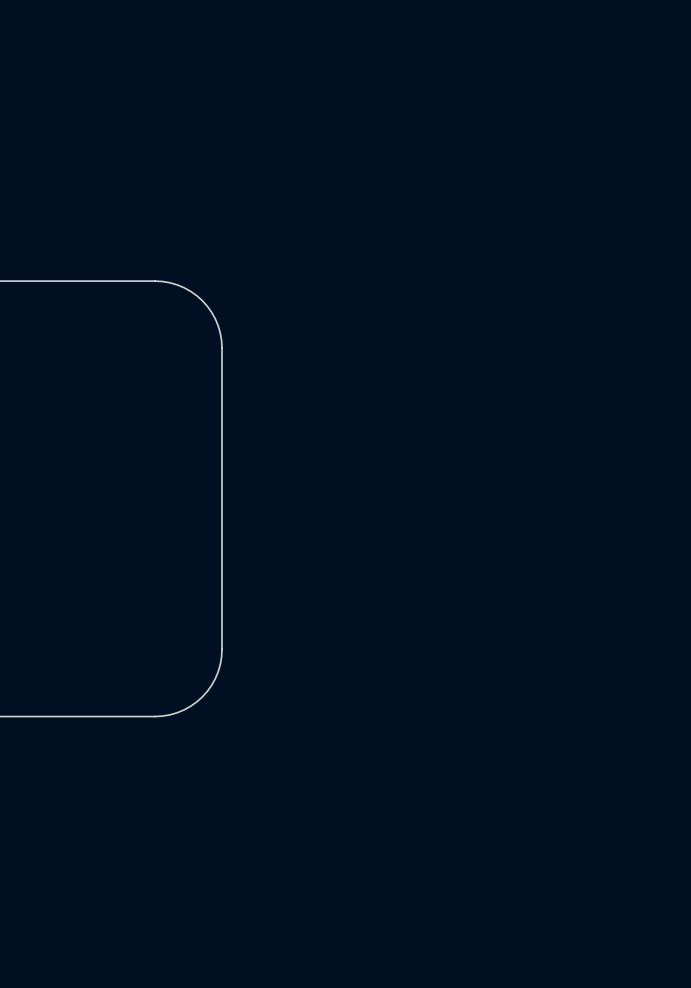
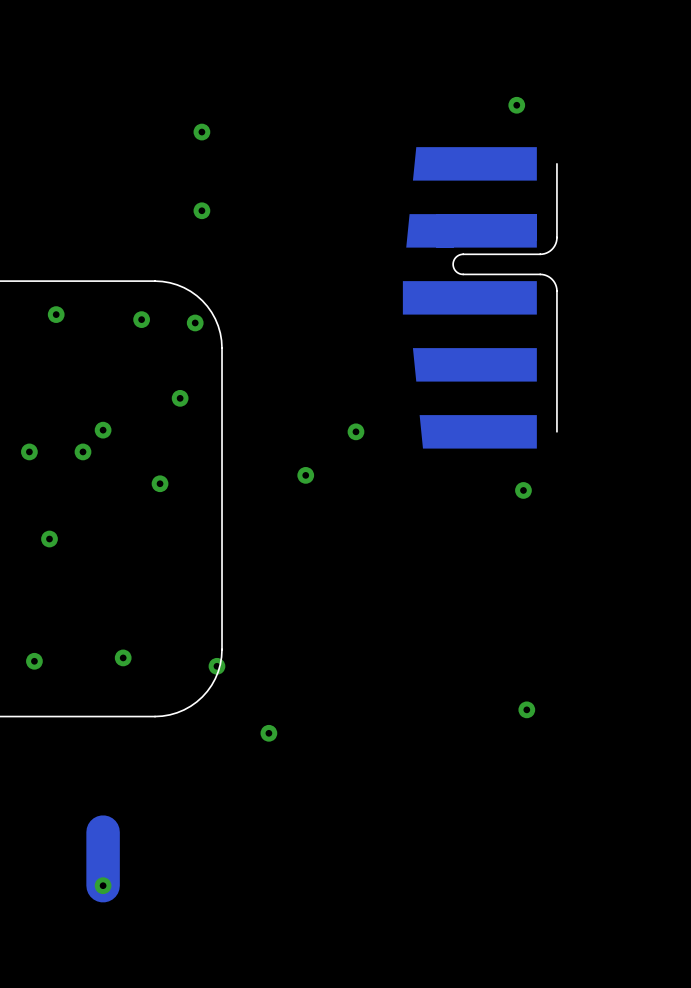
via: none -> (516, 105)
via: none -> (201, 132)
via: none -> (201, 210)
part: none -> (480, 297)
via: none -> (56, 314)
via: none -> (141, 319)
via: none -> (195, 322)
via: none -> (180, 398)
via: none -> (103, 430)
via: none -> (355, 431)
via: none -> (29, 451)
via: none -> (83, 451)
via: none -> (305, 475)
via: none -> (160, 483)
via: none -> (523, 490)
via: none -> (49, 539)
via: none -> (123, 657)
via: none -> (34, 661)
via: none -> (216, 666)
via: none -> (526, 709)
via: none -> (268, 733)
track: none -> (103, 832) (103, 885)
via: none -> (103, 885)

